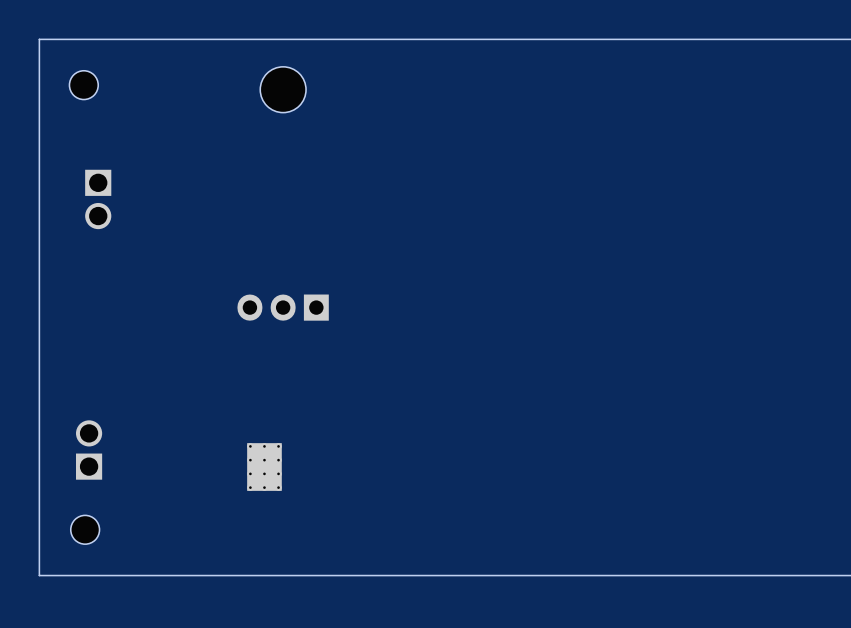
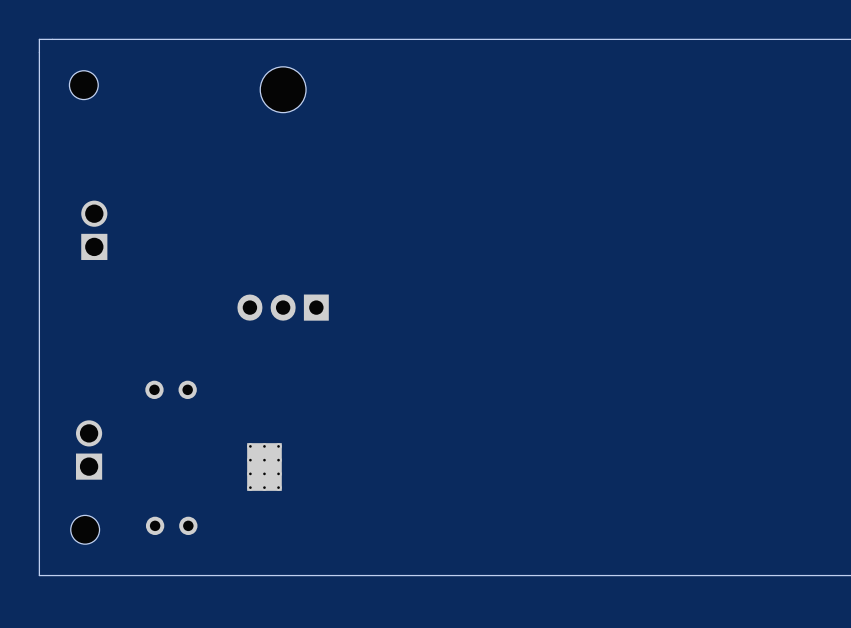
part rotation: 0° (98, 199) -> 180° (94, 230)
part: none -> (171, 389)
part: none -> (171, 525)

